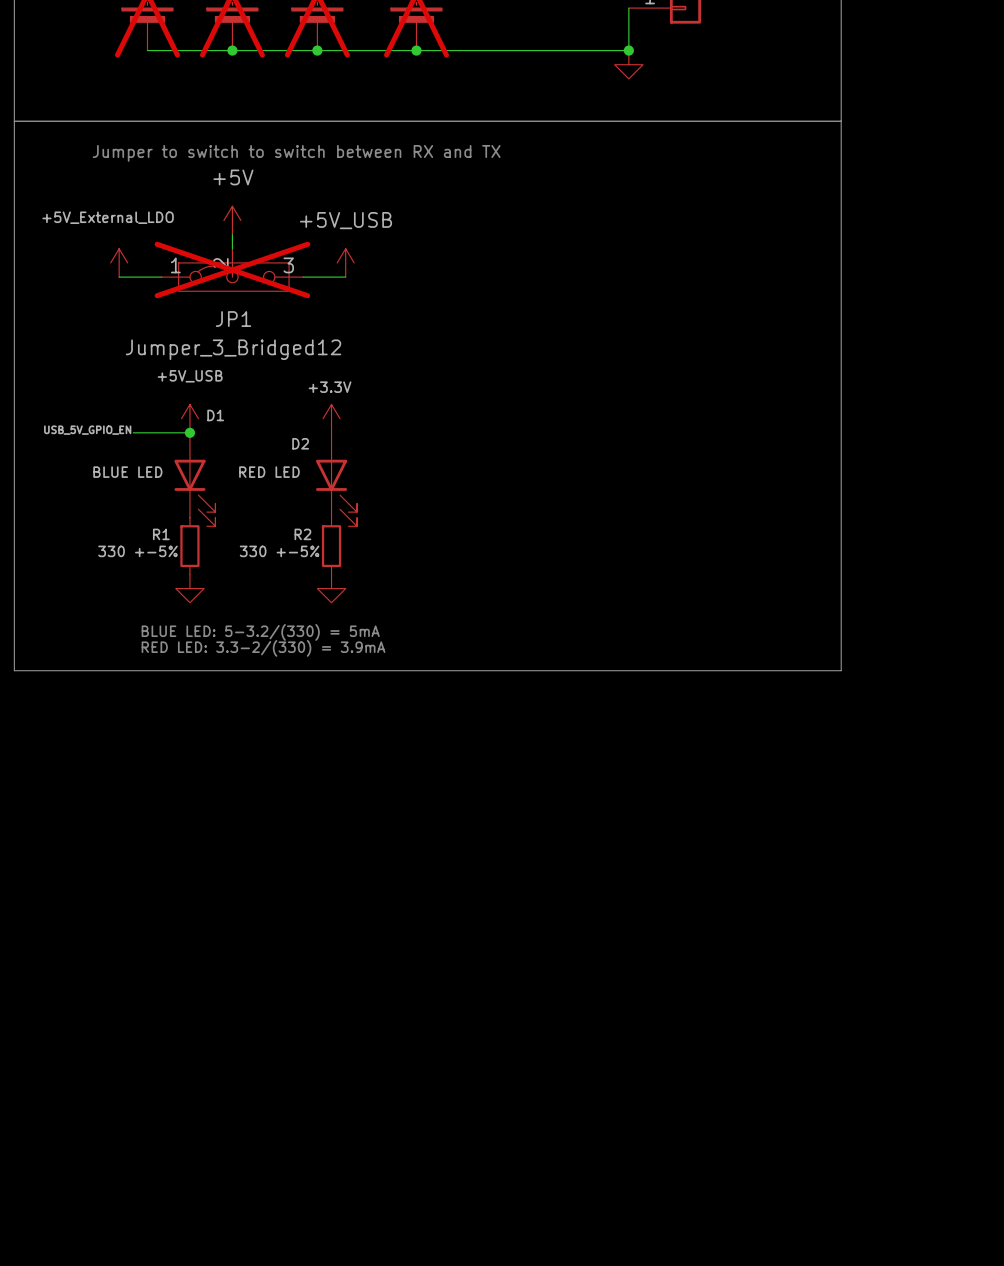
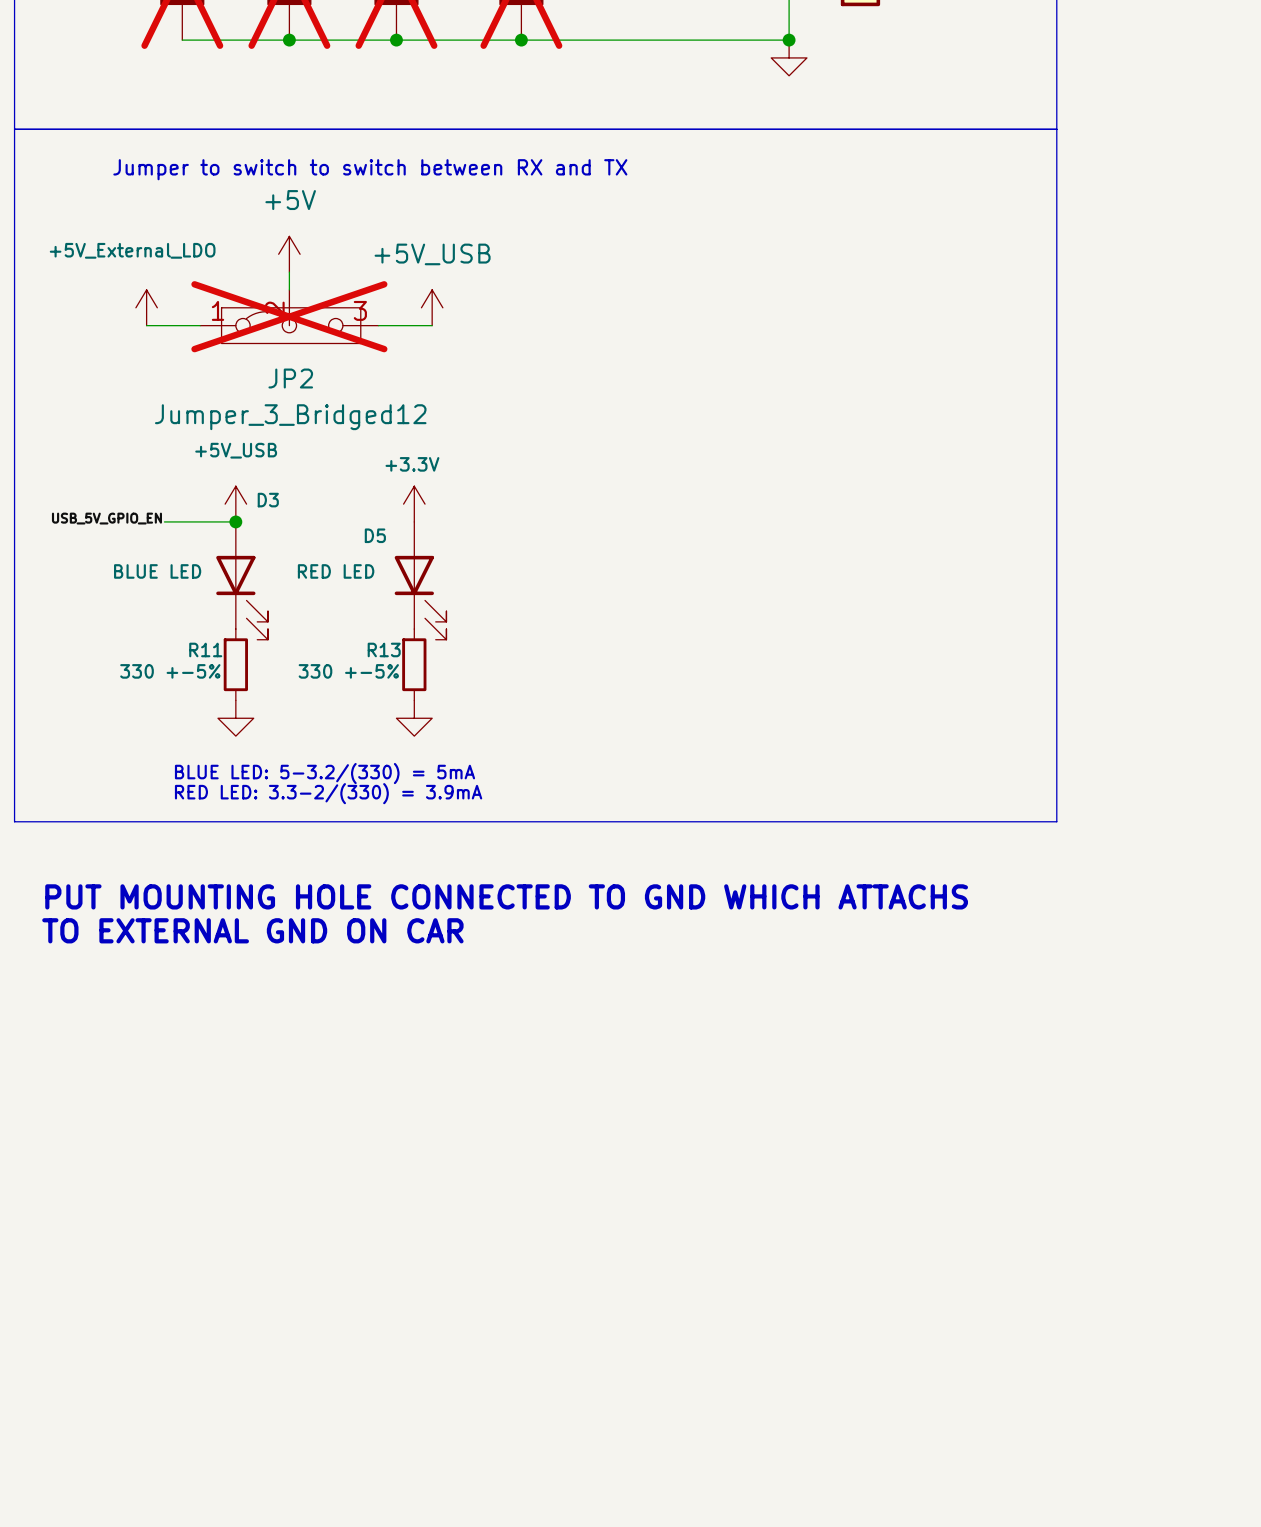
JP1 name: JP1 (233, 319) -> JP2 (290, 378)
D1 name: D1 (215, 415) -> D3 (268, 500)
D2 name: D2 (300, 443) -> D5 (375, 535)
R1 name: R1 (161, 534) -> R11 (205, 649)
R2 name: R2 (302, 534) -> R13 (384, 649)
text: none -> PUT MOUNTING HOLE CONNECTED TO GND WHICH ATTACHS (506, 896)
text: none -> TO EXTERNAL GND ON CAR (252, 930)

